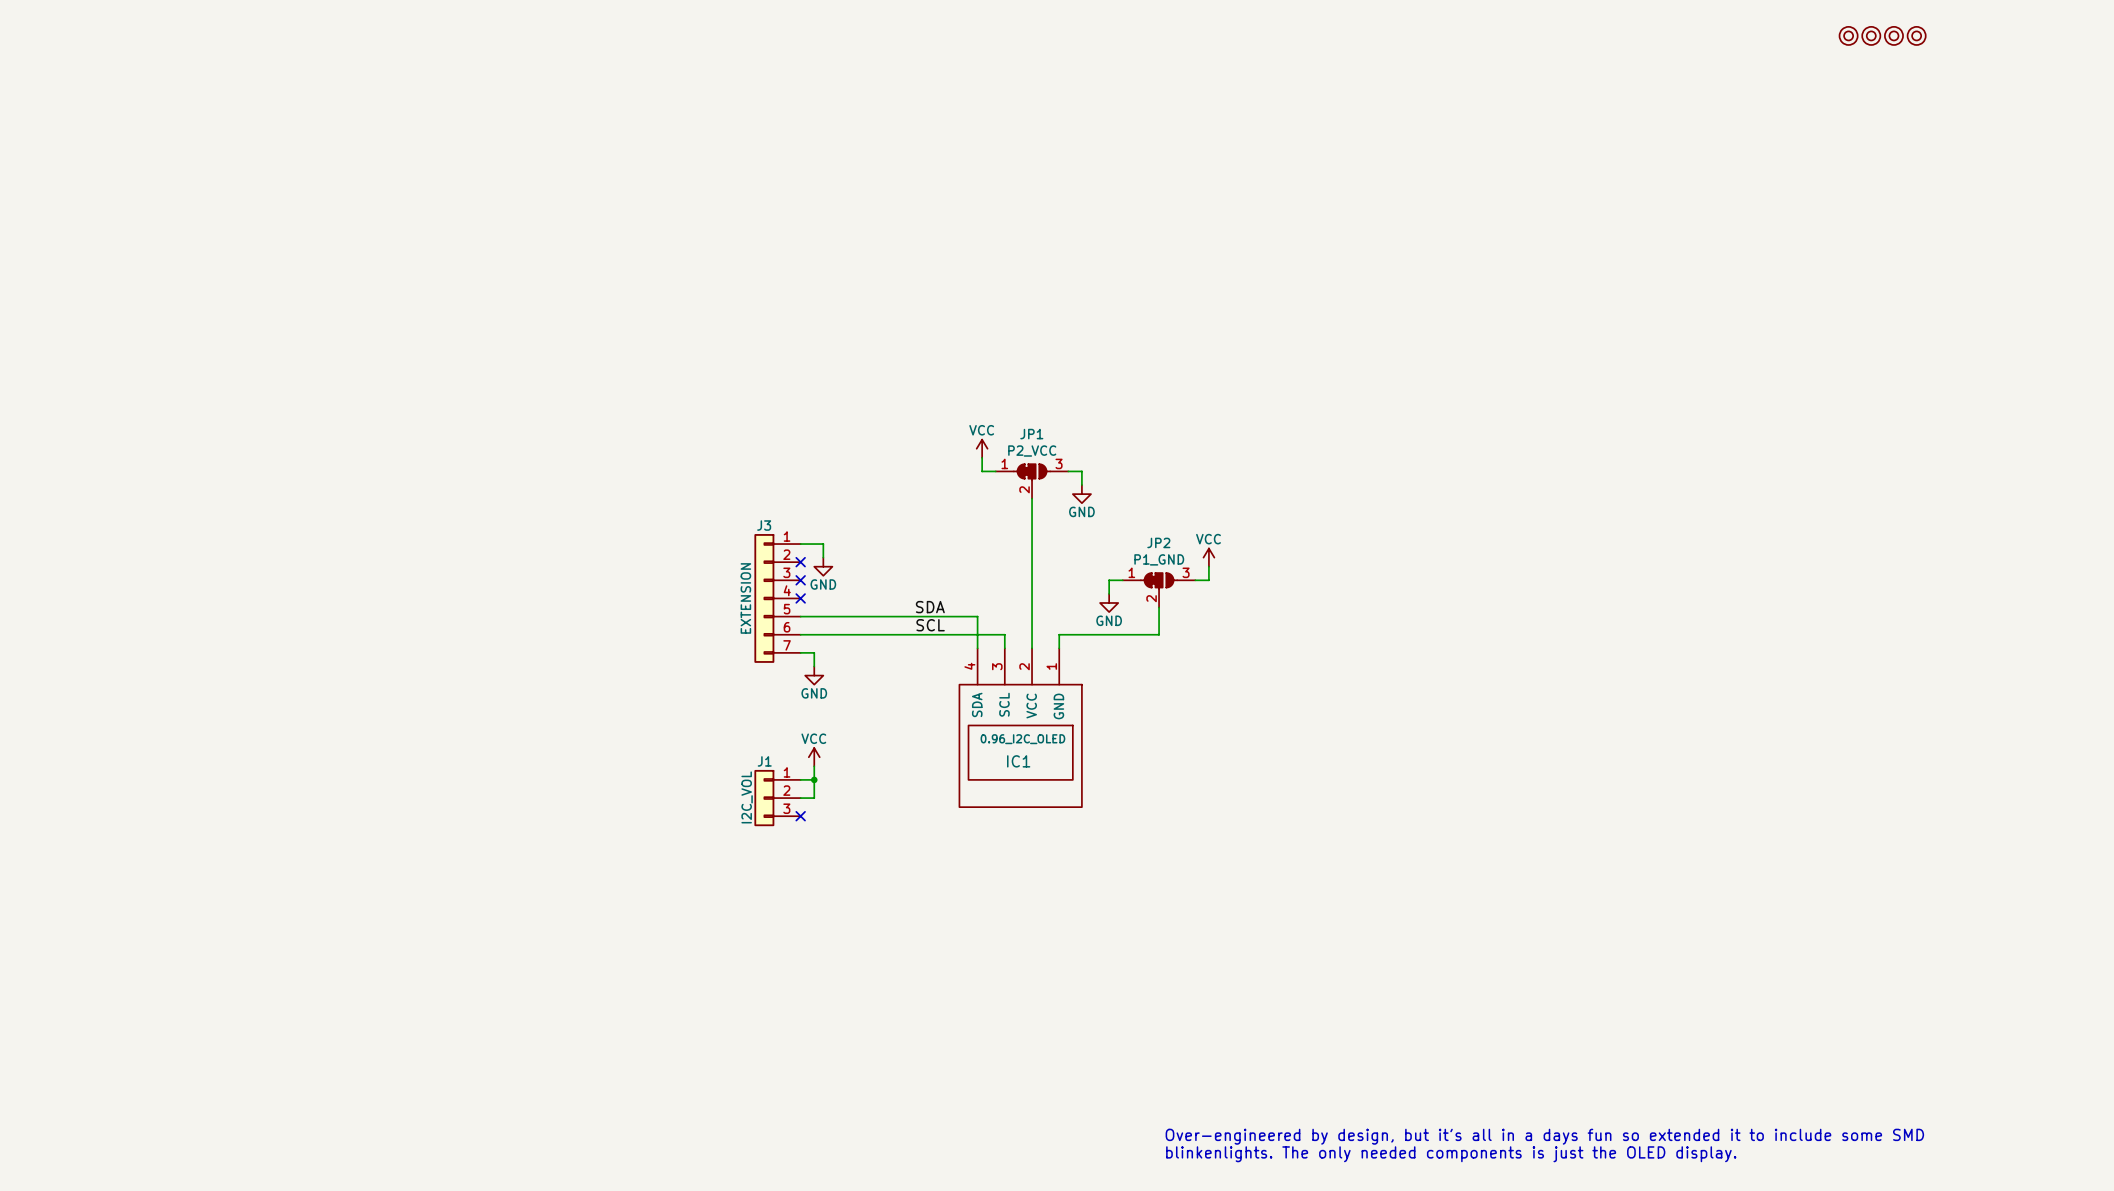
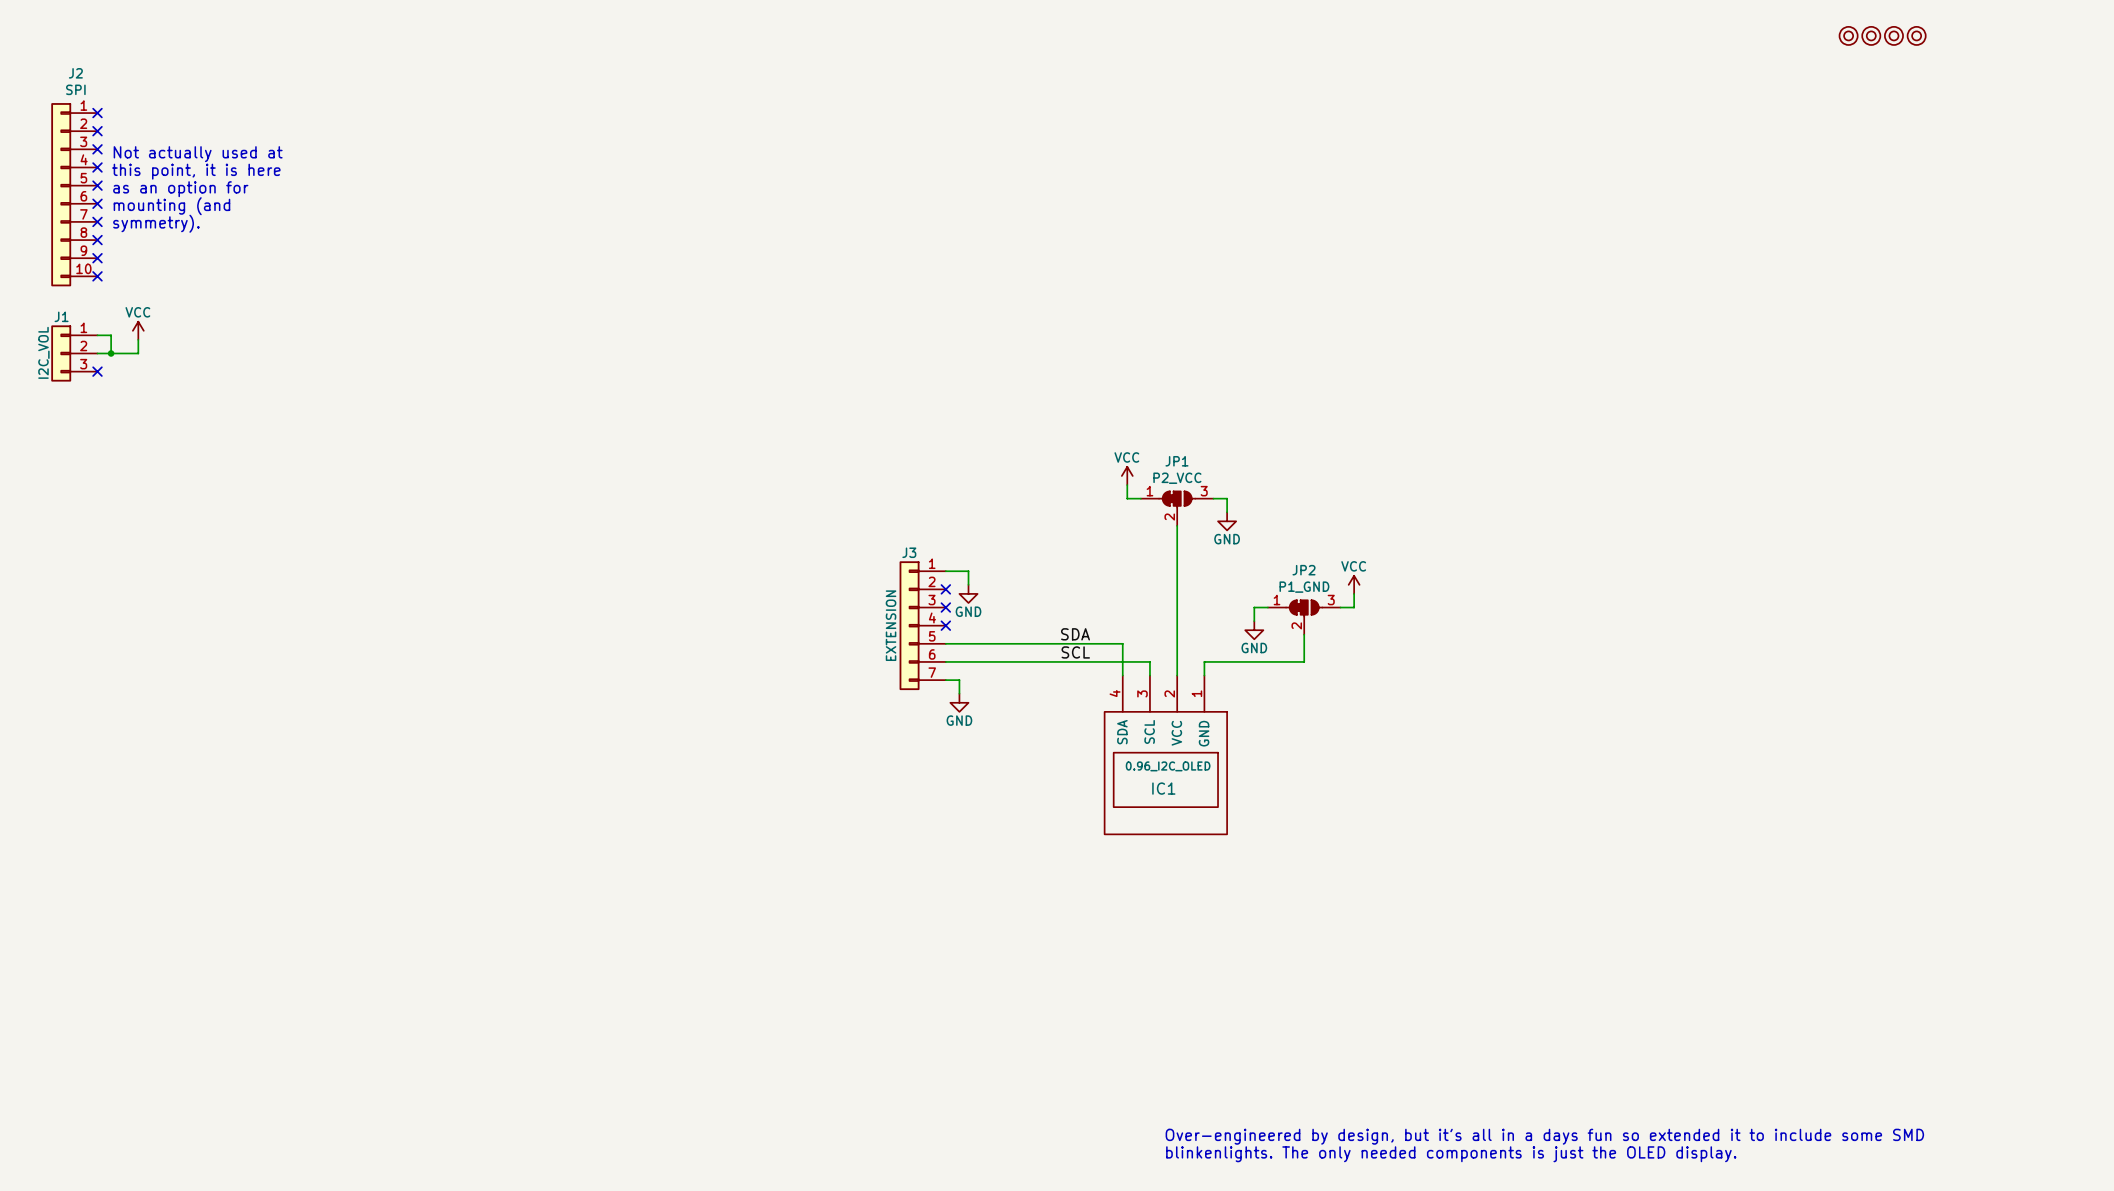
no-connect mark: none -> (97, 113)
no-connect mark: none -> (97, 131)
no-connect mark: none -> (97, 149)
text: none -> Not actually used at (198, 154)
no-connect mark: none -> (97, 167)
text: none -> this point, it is here (196, 171)
no-connect mark: none -> (97, 185)
text: none -> as an option for (180, 189)
J2: none -> SPI (74, 194)
no-connect mark: none -> (97, 203)
text: none -> mounting (and (171, 206)
no-connect mark: none -> (97, 221)
text: none -> symmetry). (156, 223)
no-connect mark: none -> (97, 240)
no-connect mark: none -> (97, 258)
no-connect mark: none -> (97, 276)
power symbol: none -> VCC (138, 330)
wire: none -> (97, 335) (111, 335) (111, 353)
wire: none -> (138, 339) (138, 353) (97, 353)
junction: none -> (111, 353)
no-connect mark: none -> (97, 371)
power symbol: VCC (982, 448) -> none
wire: (982, 457) (982, 471) (995, 471) -> (1127, 485) (1127, 498) (1140, 498)
wire: (1068, 471) (1081, 471) (1081, 485) -> (1213, 498) (1227, 498) (1227, 512)
power symbol: none -> VCC (1127, 475)
JP1 position: (1032, 481) -> (1177, 508)
power symbol: GND (1081, 494) -> none
wire: (1032, 498) (1032, 648) -> (1177, 525) (1177, 675)
power symbol: none -> GND (1227, 521)
wire: (800, 544) (823, 544) (823, 557) -> (945, 571) (968, 571) (968, 584)
power symbol: VCC (1208, 557) -> none
no-connect mark: (800, 562) -> none
power symbol: GND (823, 566) -> none
wire: (1208, 566) (1208, 580) (1195, 580) -> (1354, 593) (1354, 607) (1340, 607)
no-connect mark: (800, 580) -> none
wire: (1122, 580) (1109, 580) (1109, 593) -> (1267, 607) (1254, 607) (1254, 621)
power symbol: none -> VCC (1354, 584)
no-connect mark: none -> (945, 589)
JP2 position: (1159, 590) -> (1304, 617)
power symbol: none -> GND (968, 593)
J3 position: (777, 598) -> (922, 625)
no-connect mark: (800, 598) -> none
power symbol: GND (1109, 602) -> none
label position: SDA (930, 607) -> SDA (1075, 634)
no-connect mark: none -> (945, 607)
wire: (1159, 607) (1159, 634) (1059, 634) (1059, 648) -> (1304, 634) (1304, 661) (1204, 661) (1204, 675)
wire: (800, 616) (977, 616) (977, 648) -> (945, 643) (1122, 643) (1122, 675)
label position: SCL (930, 625) -> SCL (1075, 652)
no-connect mark: none -> (945, 625)
power symbol: none -> GND (1254, 630)
wire: (800, 634) (1004, 634) (1004, 648) -> (945, 661) (1149, 661) (1149, 675)
wire: (800, 652) (814, 652) (814, 666) -> (945, 680) (959, 680) (959, 693)
power symbol: GND (814, 675) -> none
power symbol: none -> GND (959, 702)
IC1 position: (1020, 727) -> (1165, 754)
power symbol: VCC (814, 757) -> none
wire: (814, 766) (814, 798) (800, 798) -> none
wire: (800, 779) (814, 779) -> none
junction: (814, 779) -> none
J1 position: (777, 798) -> (74, 353)
no-connect mark: (800, 816) -> none

